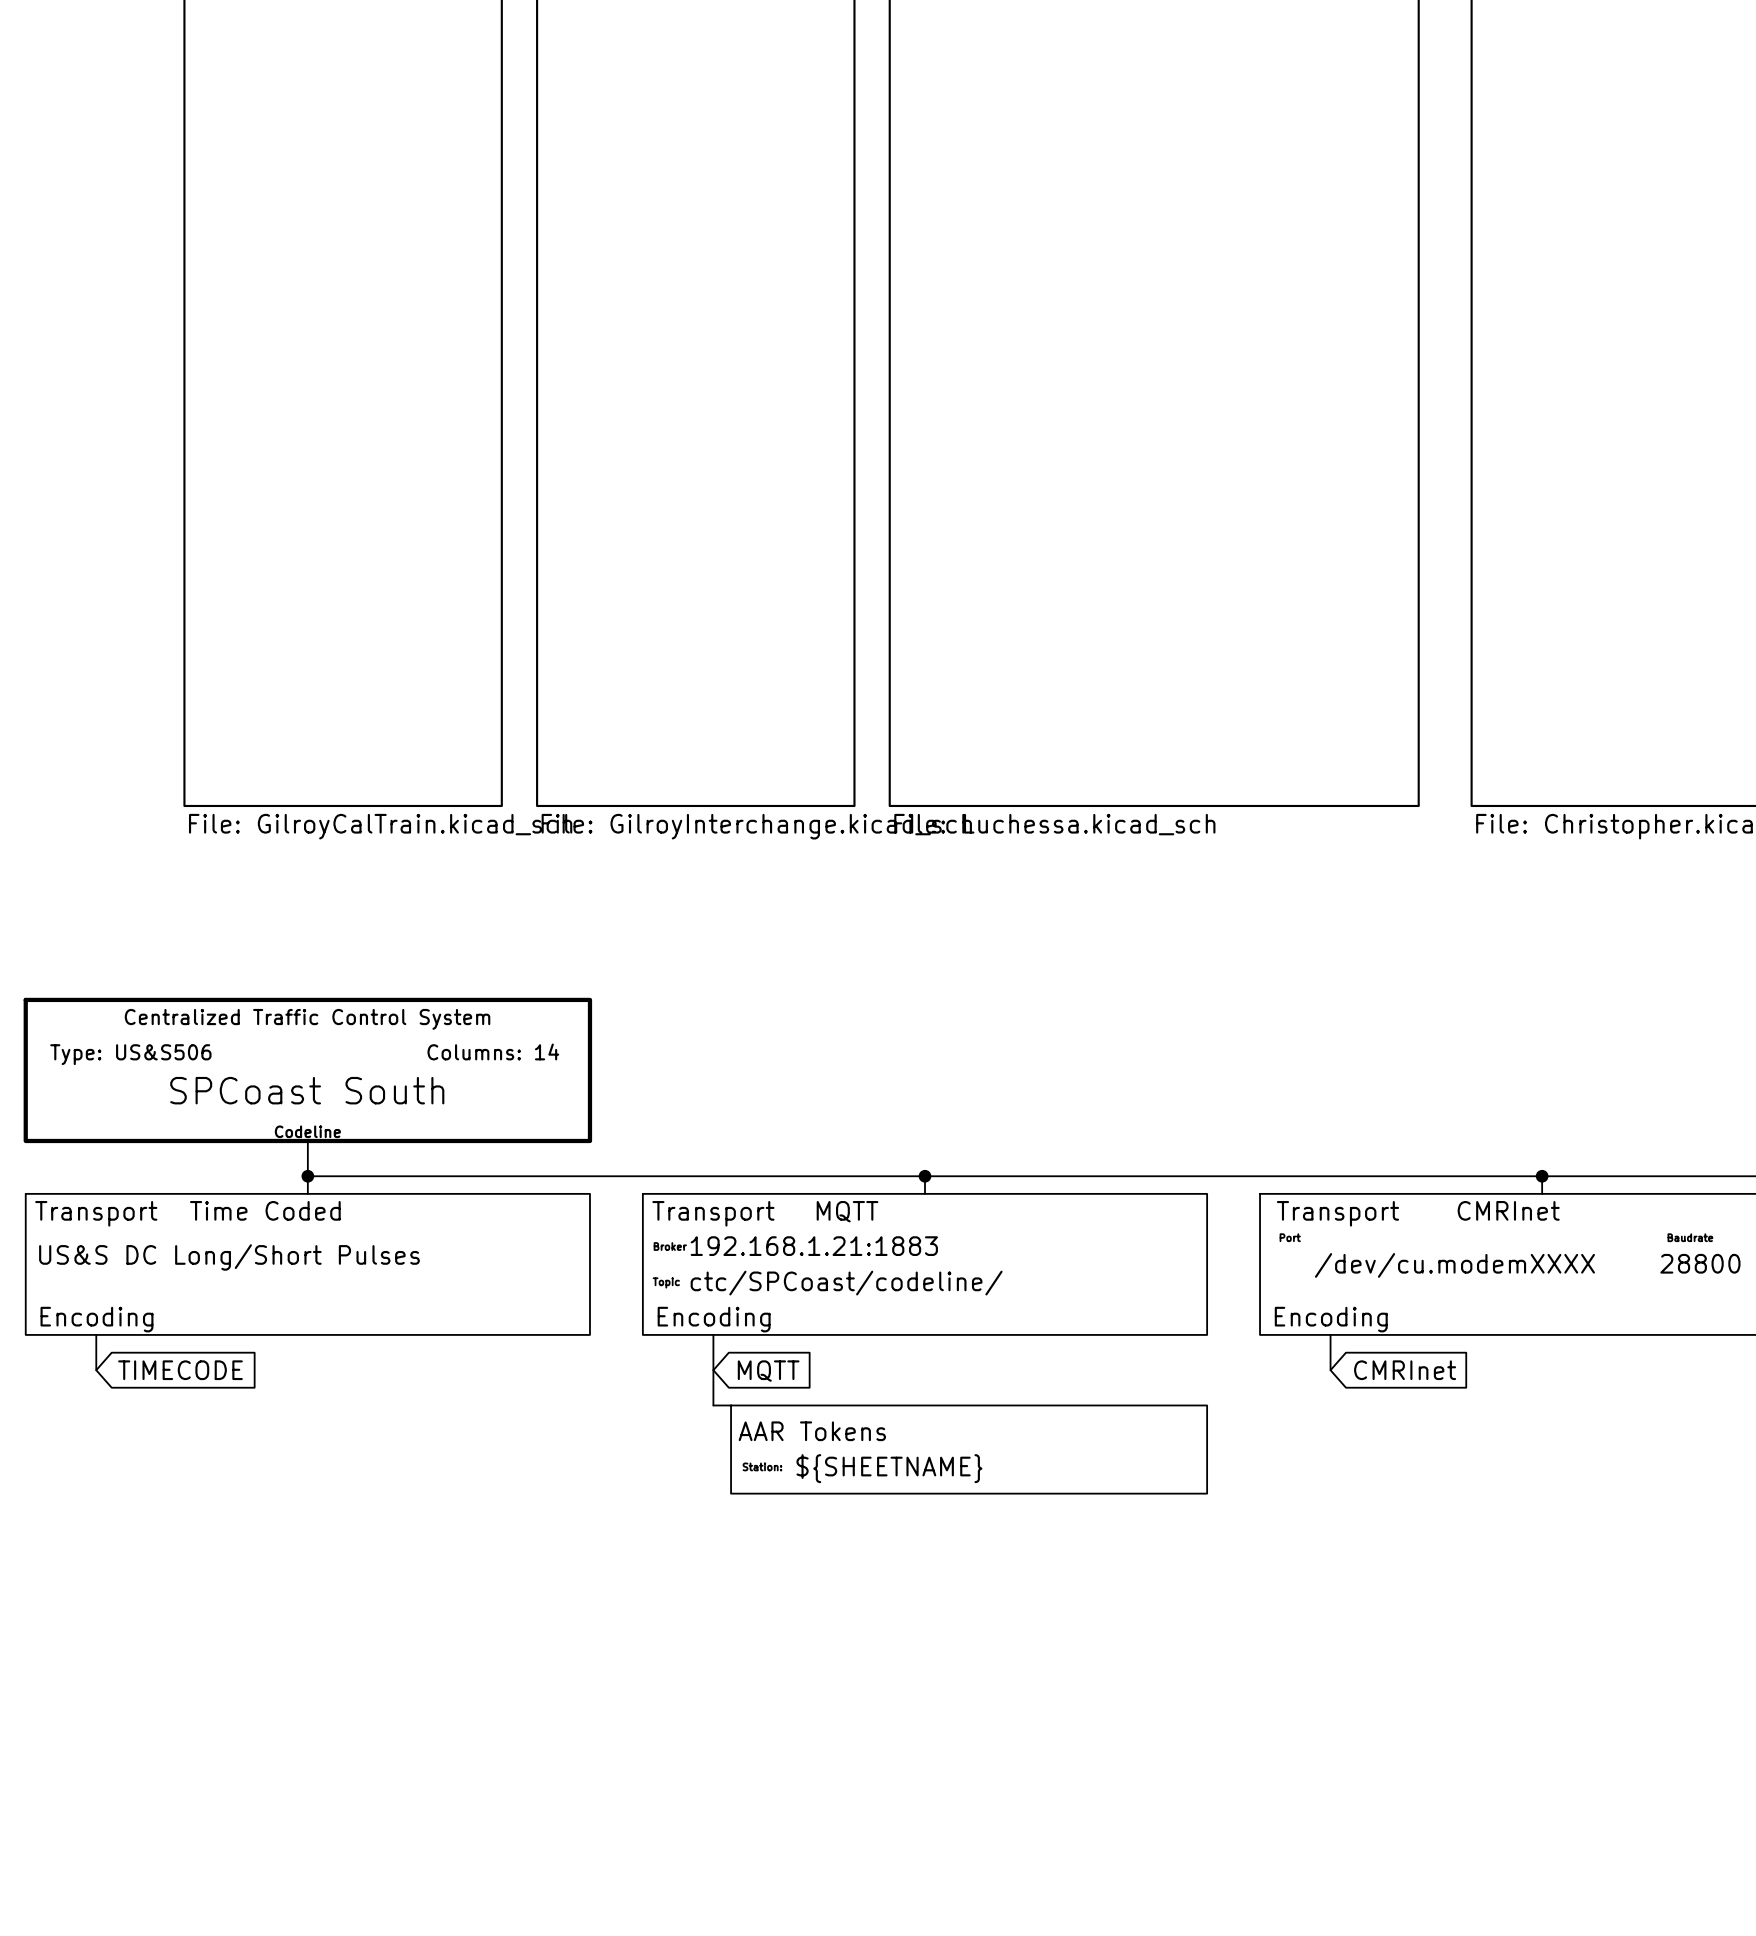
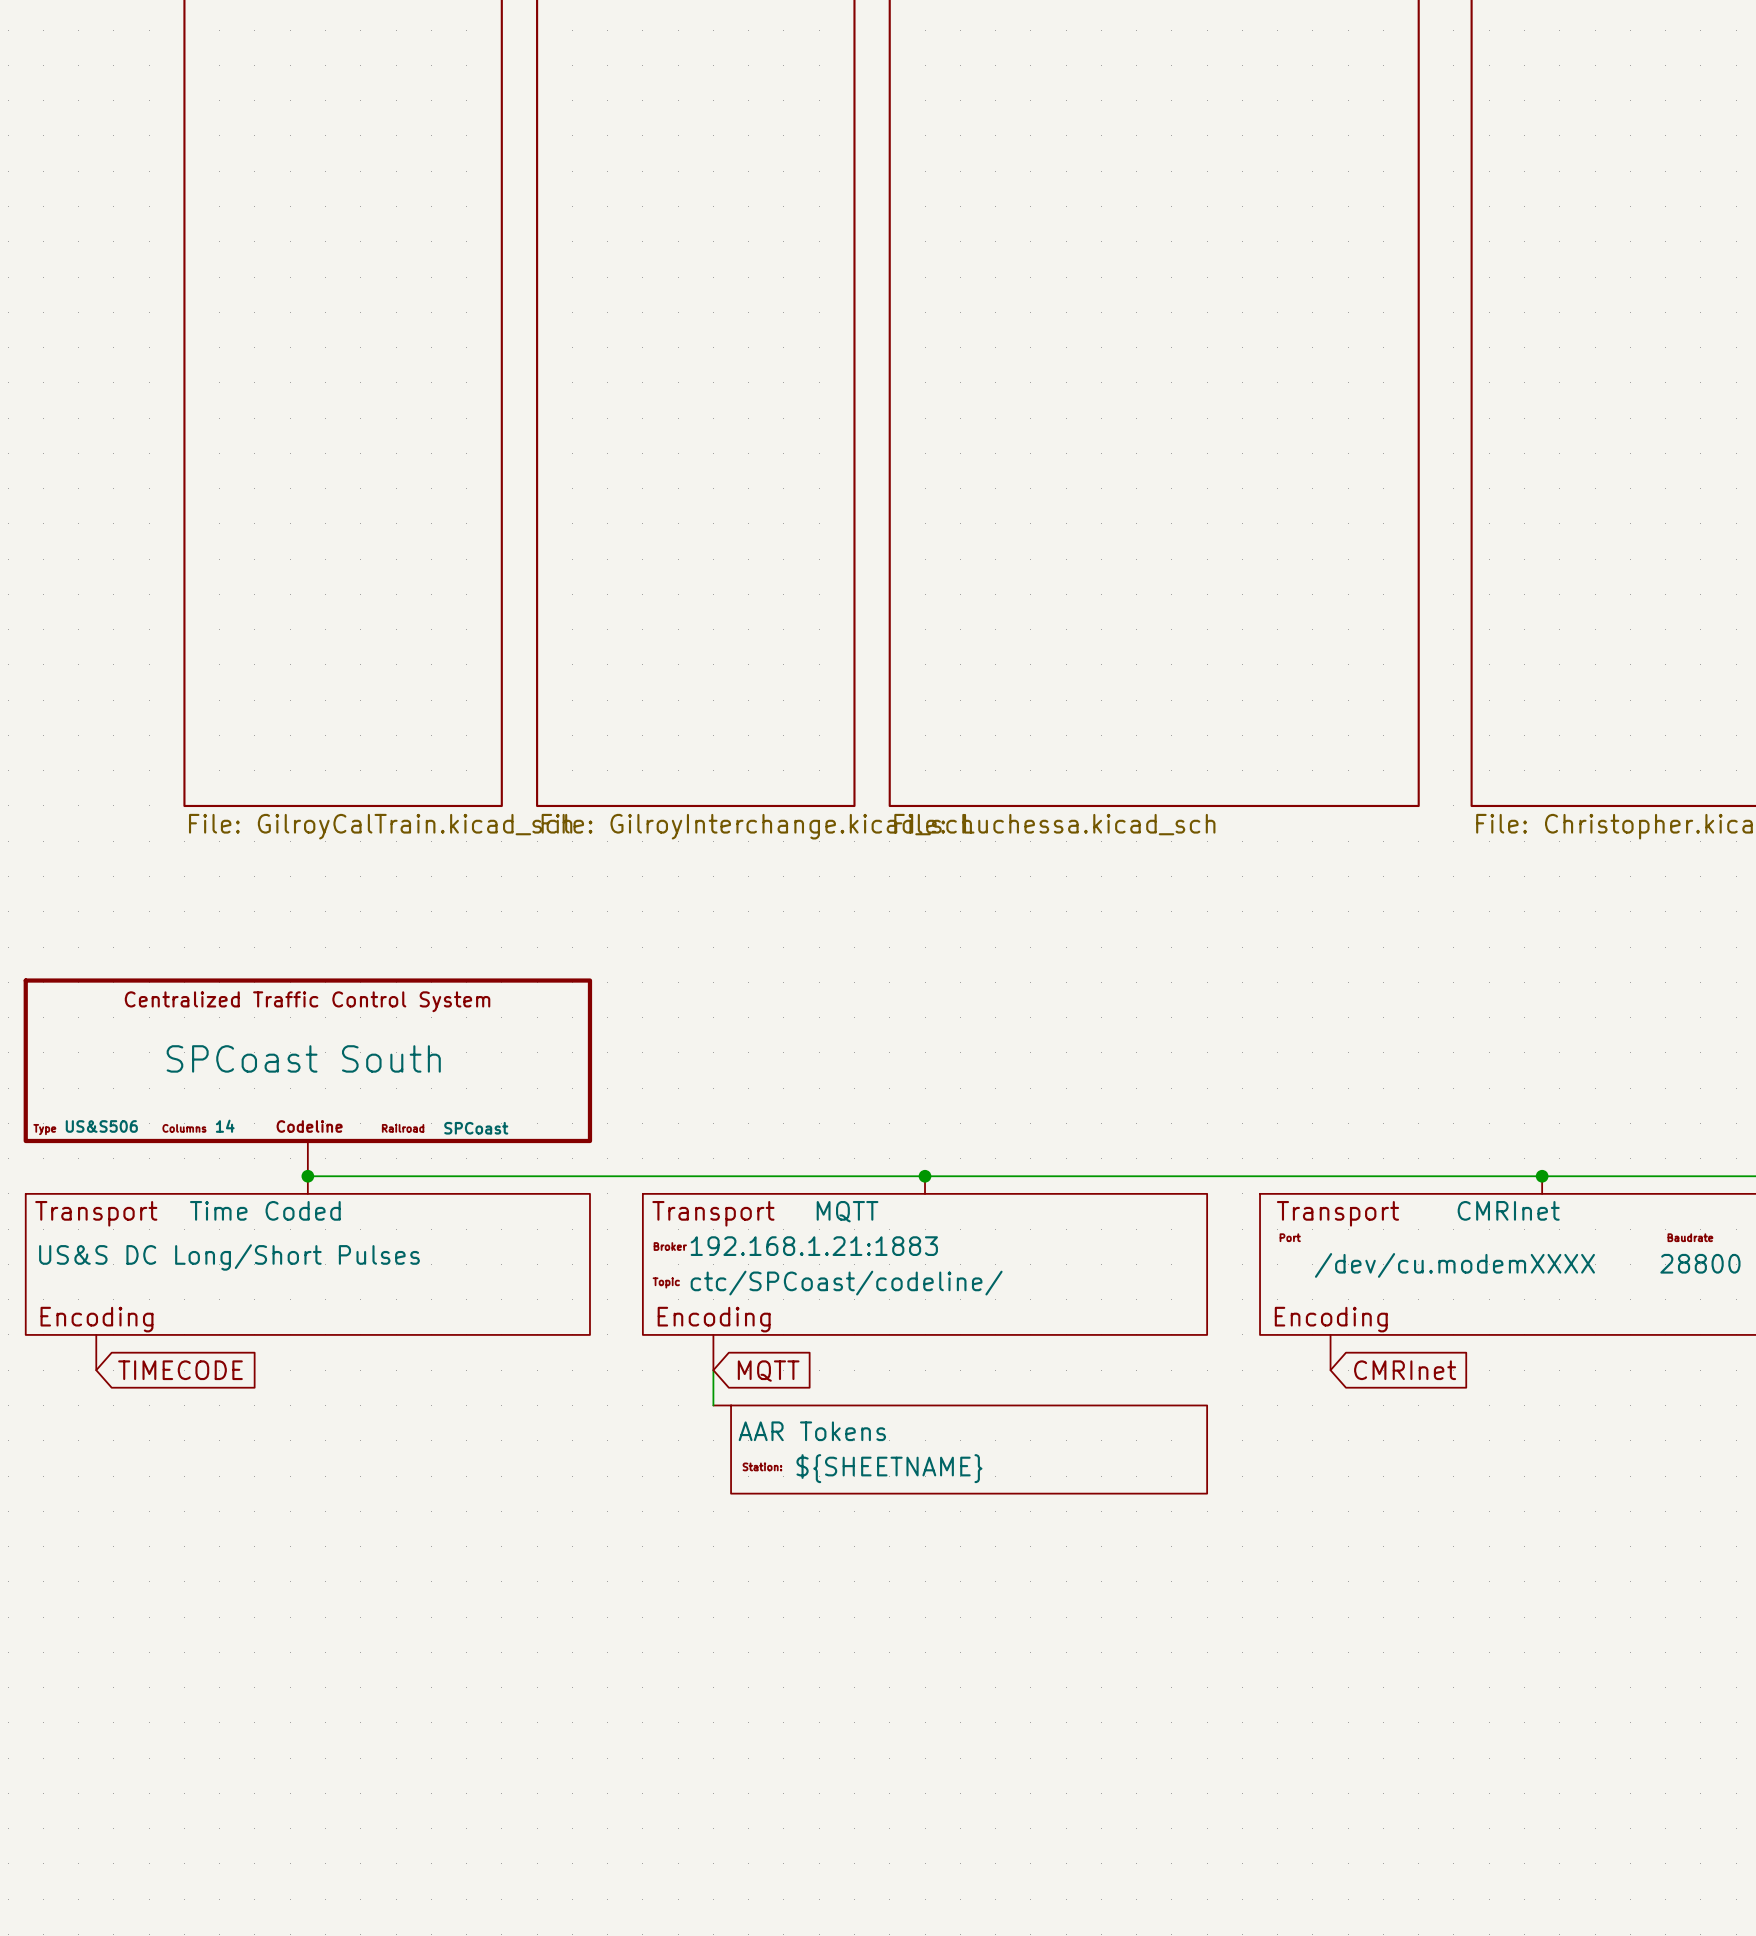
part symbol: [23, 997, 593, 1177] -> [23, 978, 593, 1177]
part text: Columns: 14 (493, 1051) -> 14 (225, 1126)
part text: Type: US&S506 (130, 1054) -> US&S506 (101, 1126)
part text: none -> SPCoast (476, 1128)

